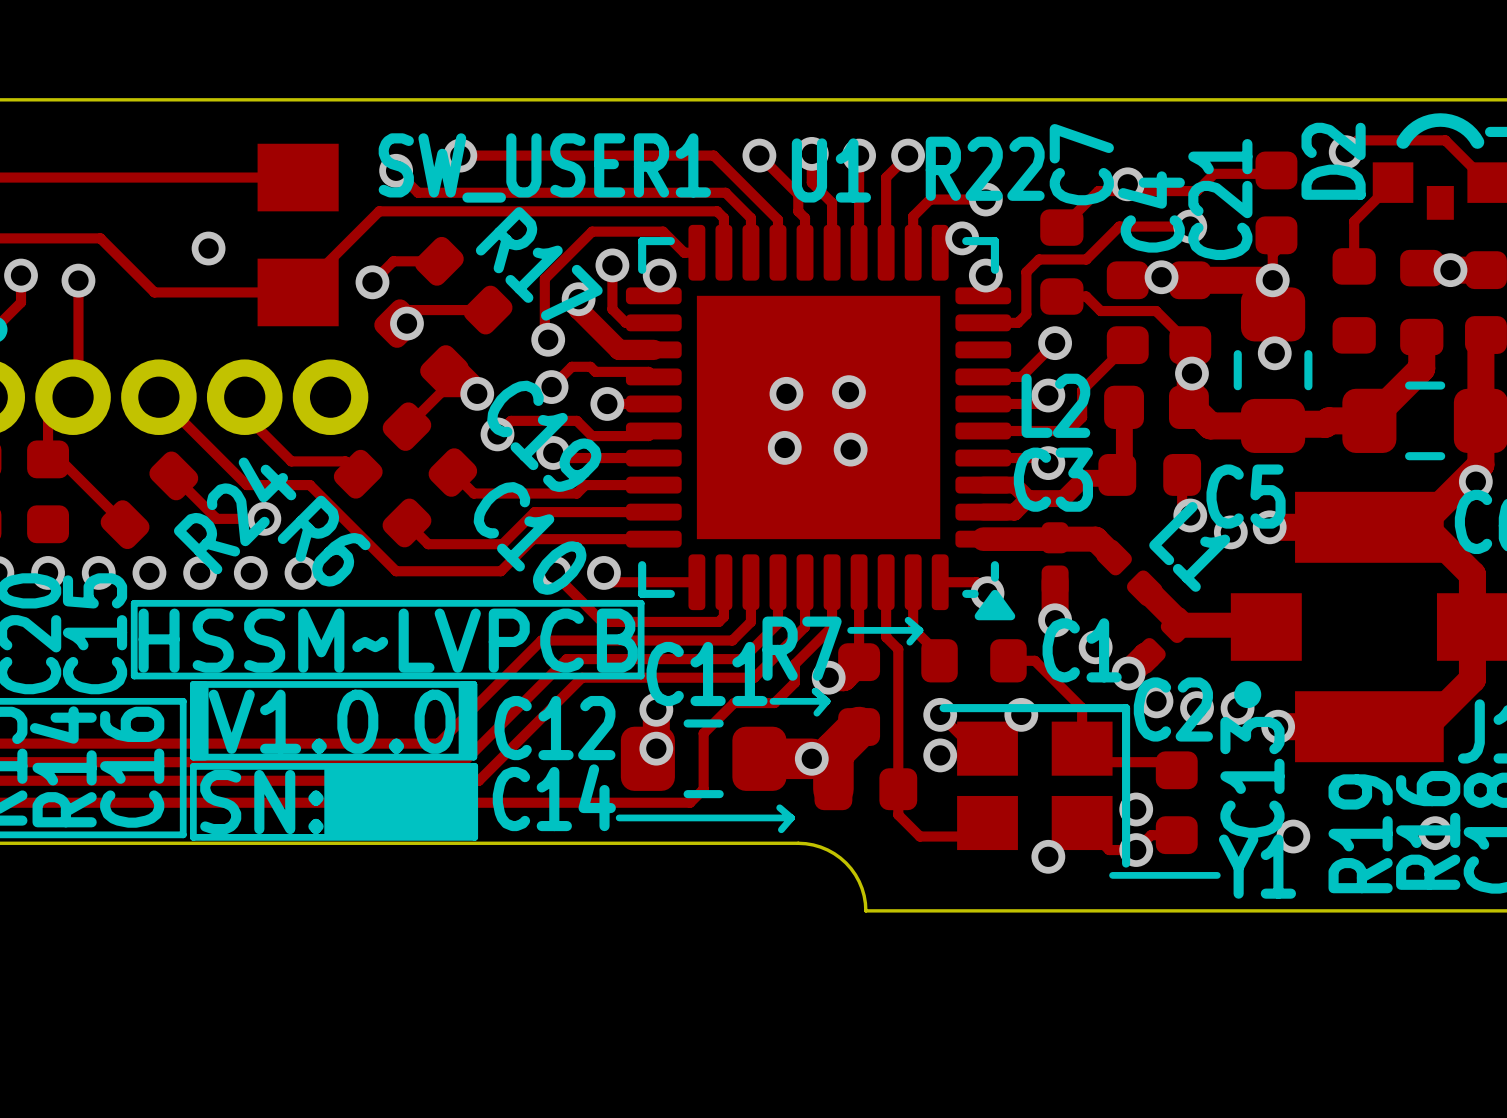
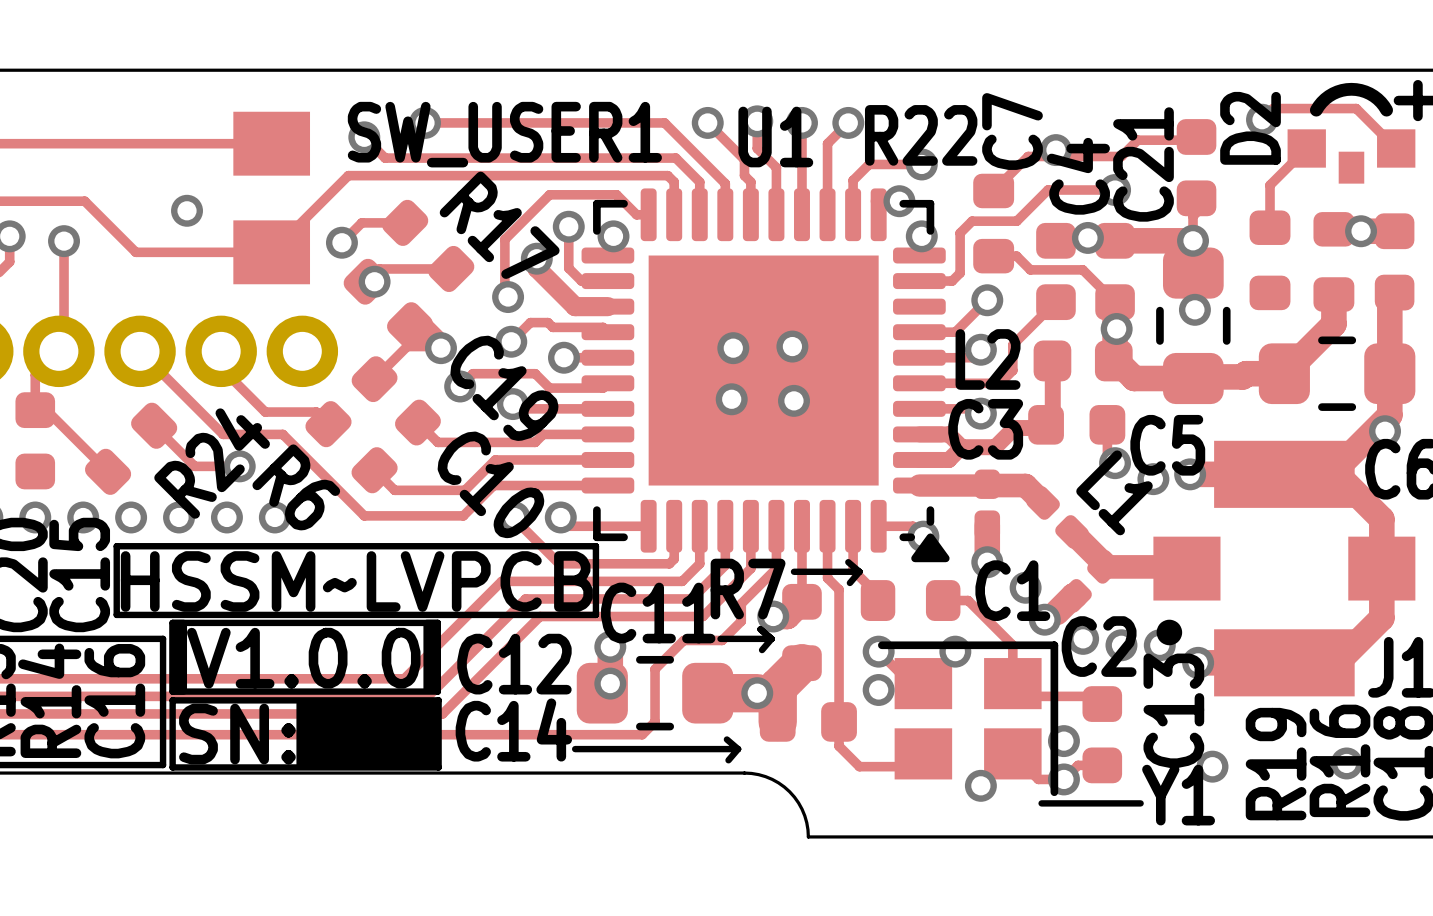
via position: (1128, 673) -> (1044, 619)

